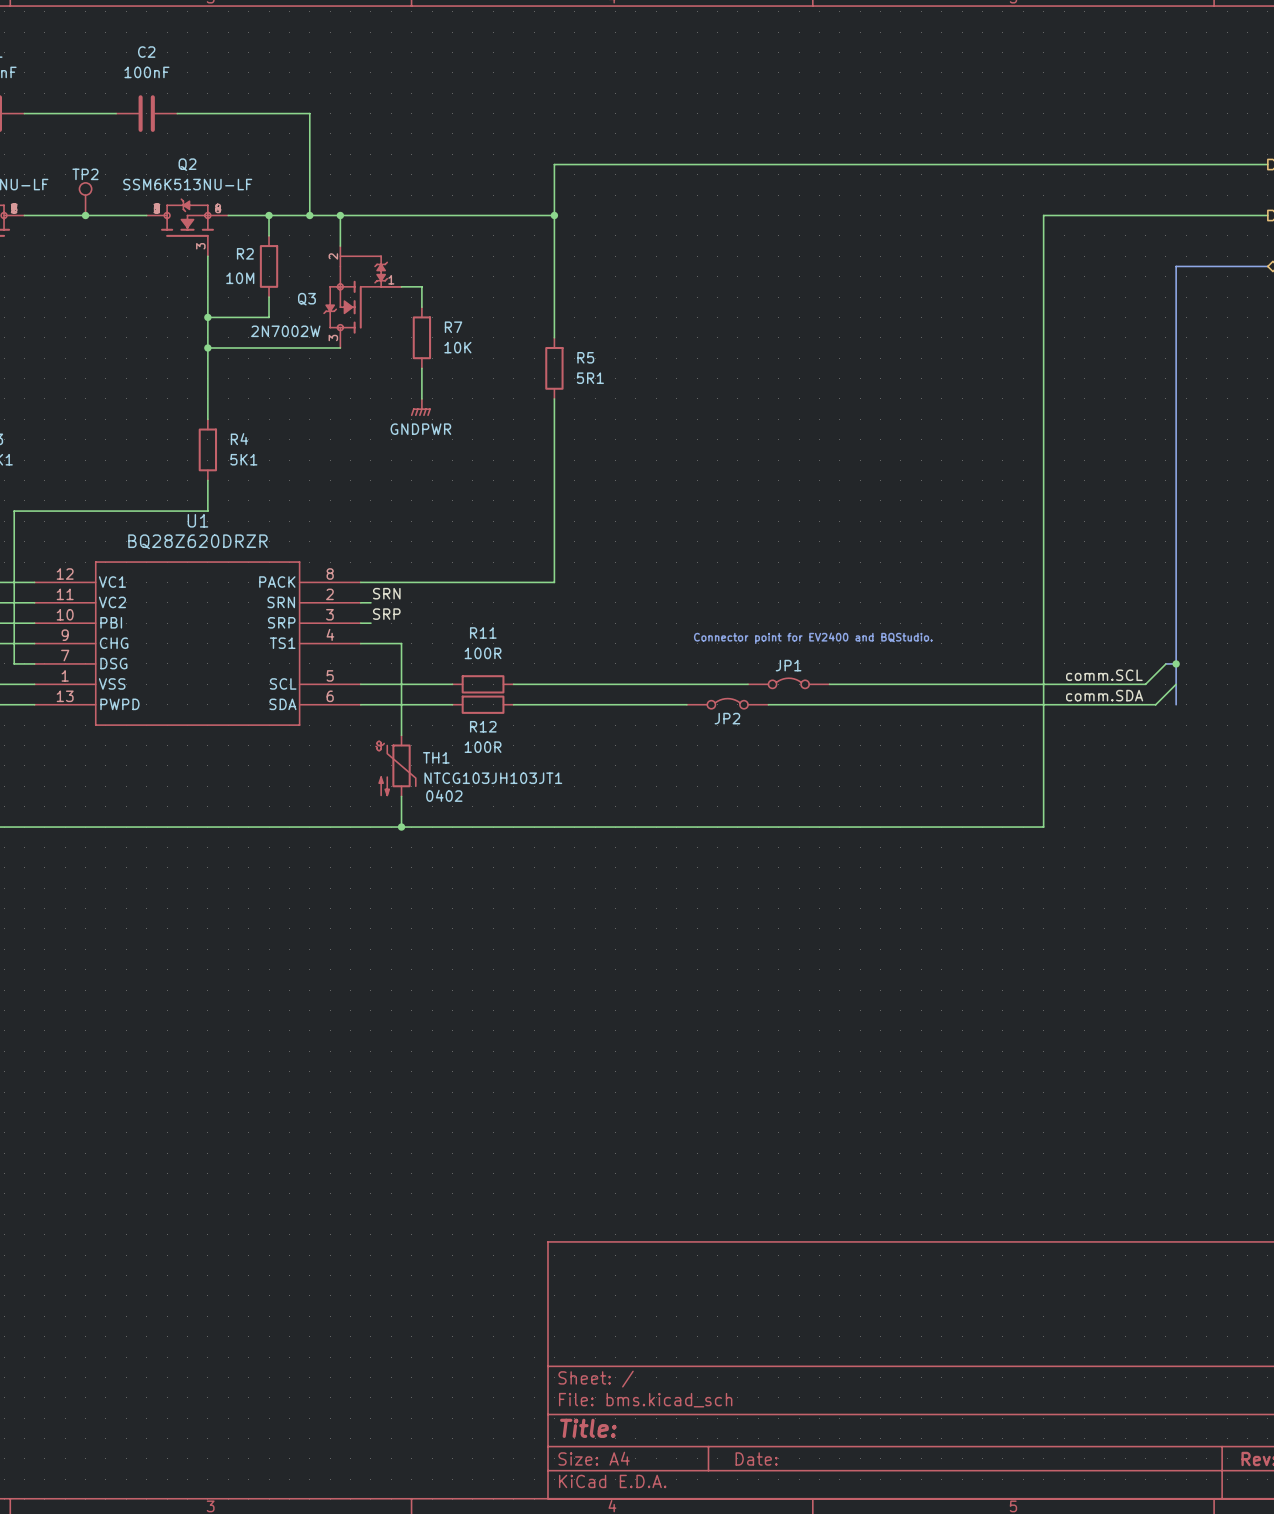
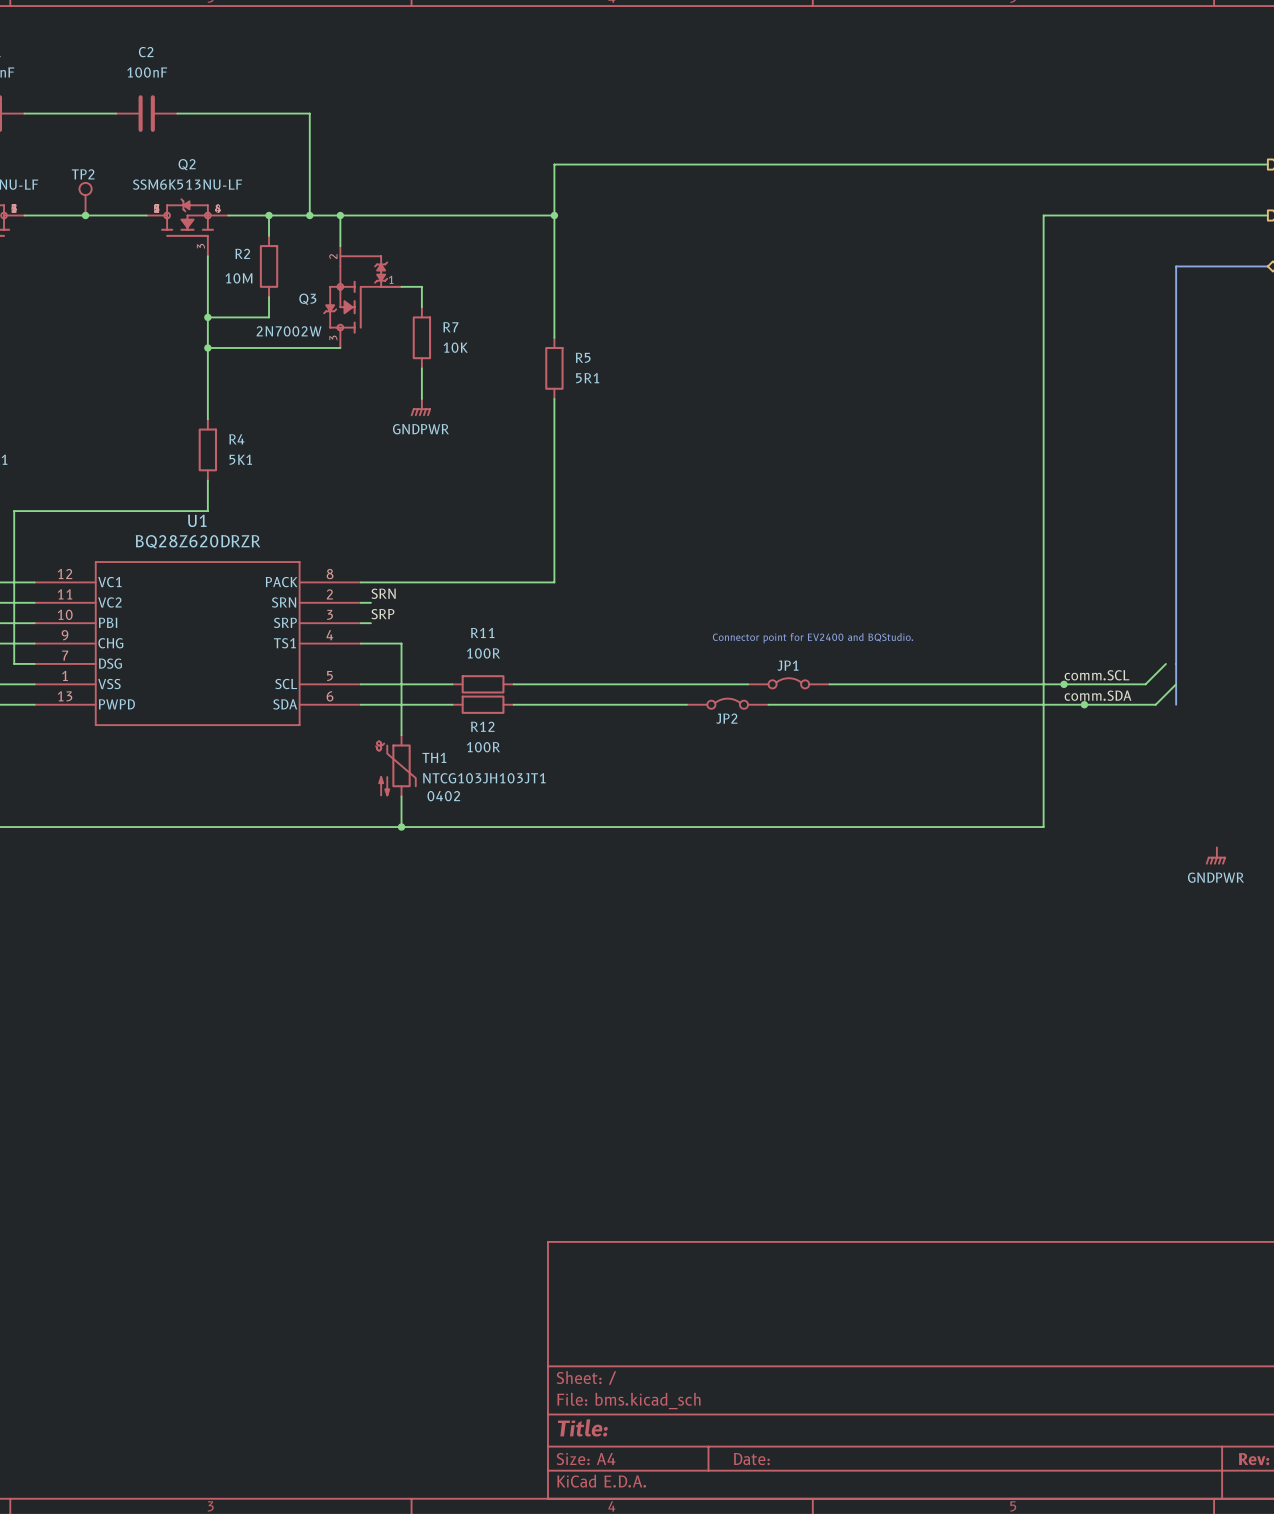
bus: (1165, 663) (1176, 663) -> none
junction: (1176, 663) -> none
junction: none -> (1064, 684)
junction: none -> (1084, 704)
power symbol: none -> GNDPWR (1215, 855)

